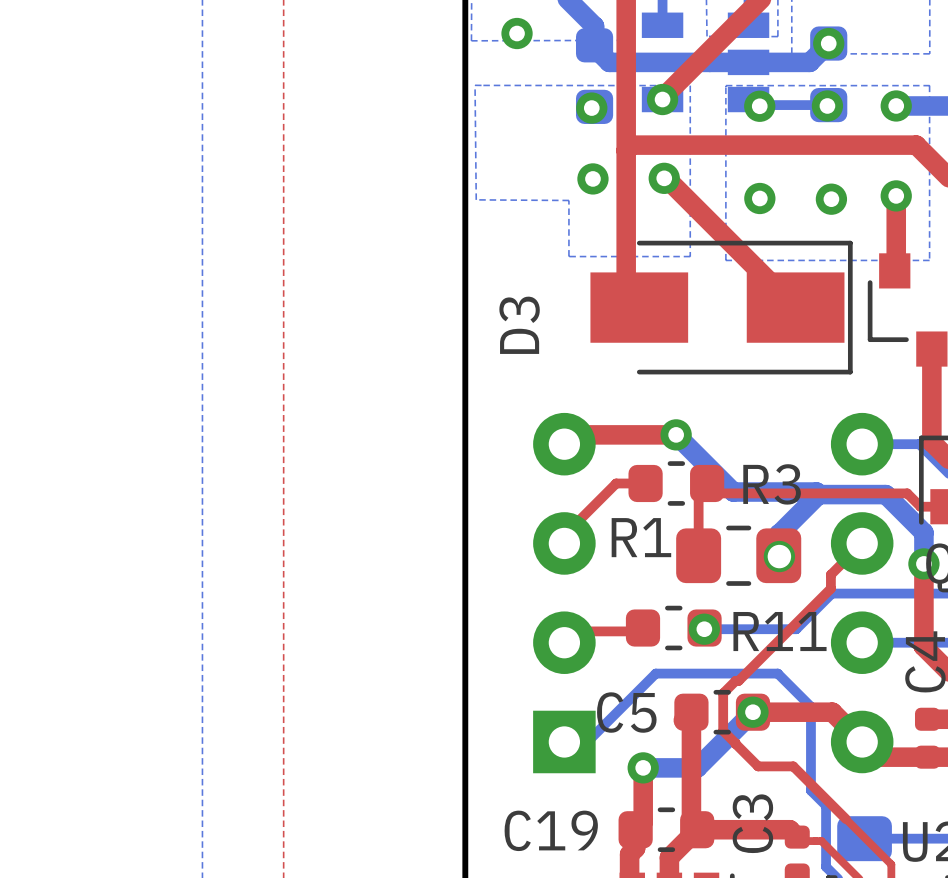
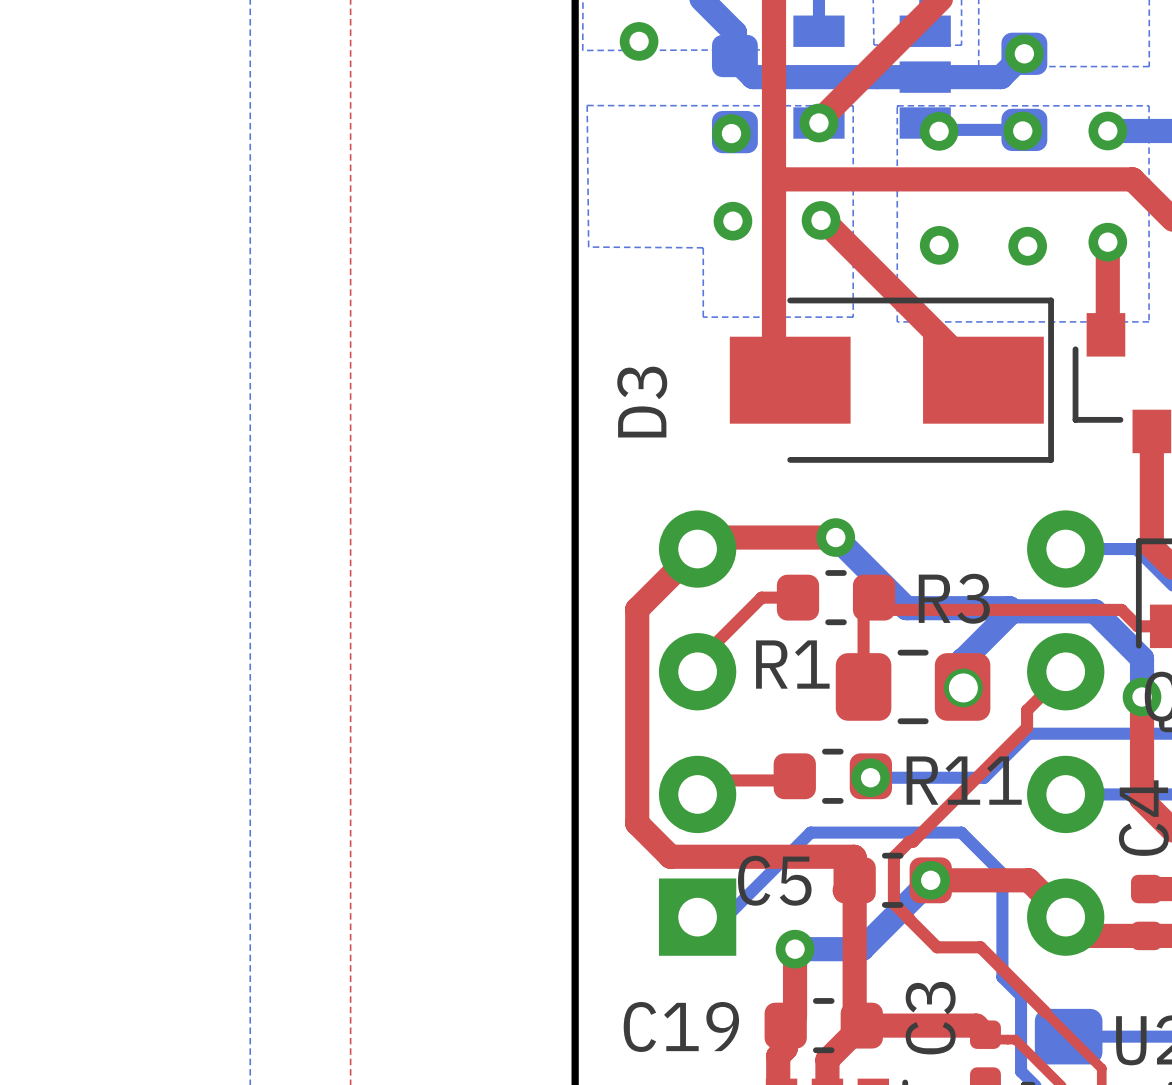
top track: none -> (697, 549) (637, 609) (637, 823) (670, 856) (854, 856)

